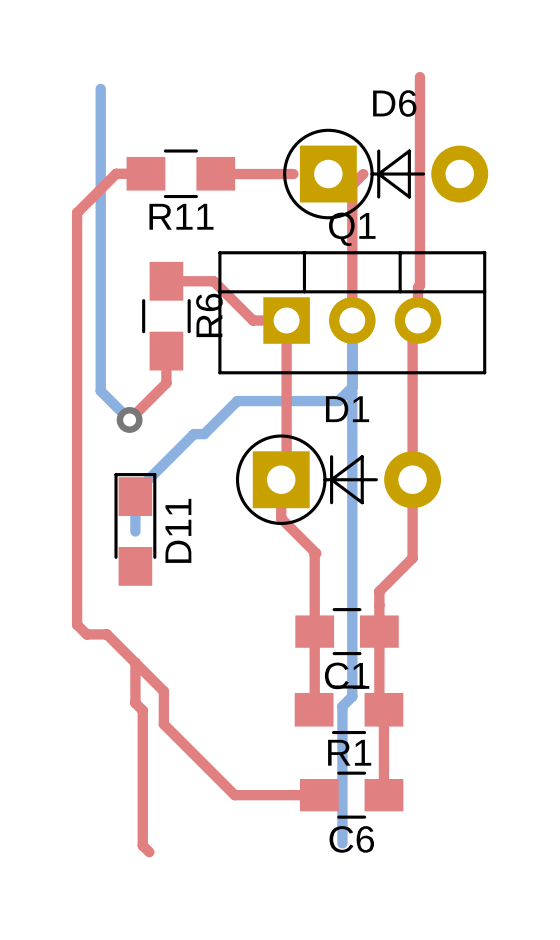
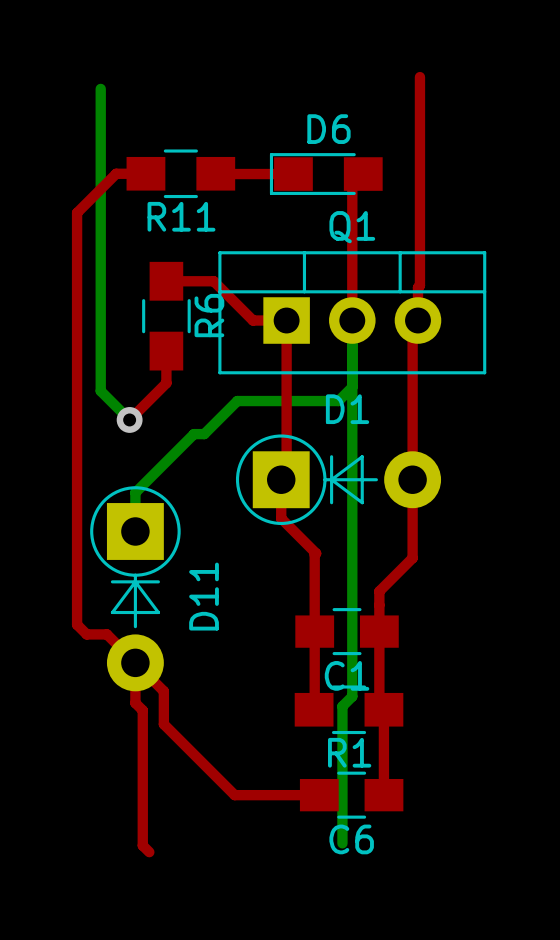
D6 footprint: [283, 128, 489, 220] -> [269, 153, 383, 195]
D11 footprint: [114, 473, 157, 586] -> [90, 486, 181, 692]

